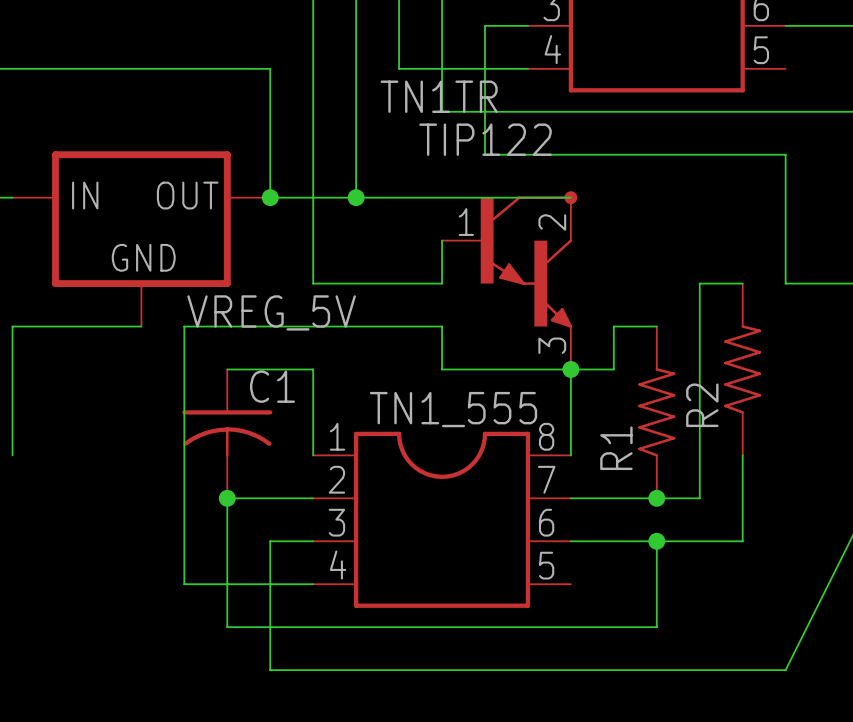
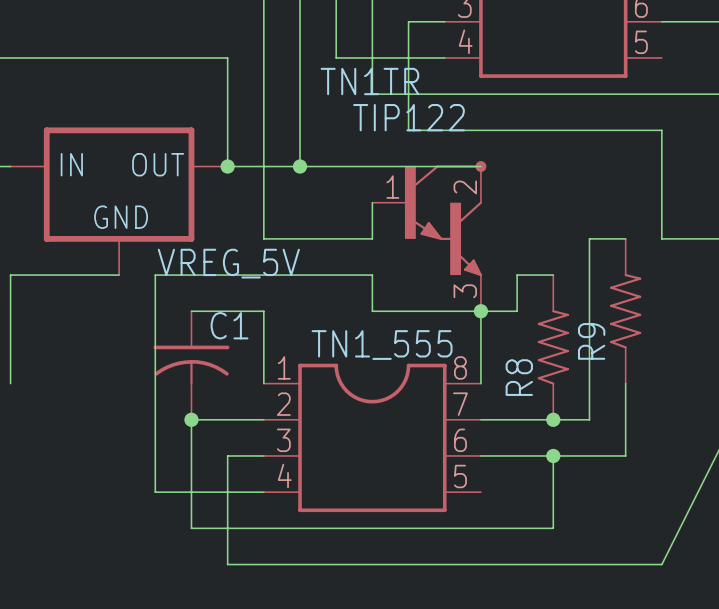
R2 name: R2 (702, 405) -> R9 (591, 341)
R1 name: R1 (616, 448) -> R8 (519, 377)

